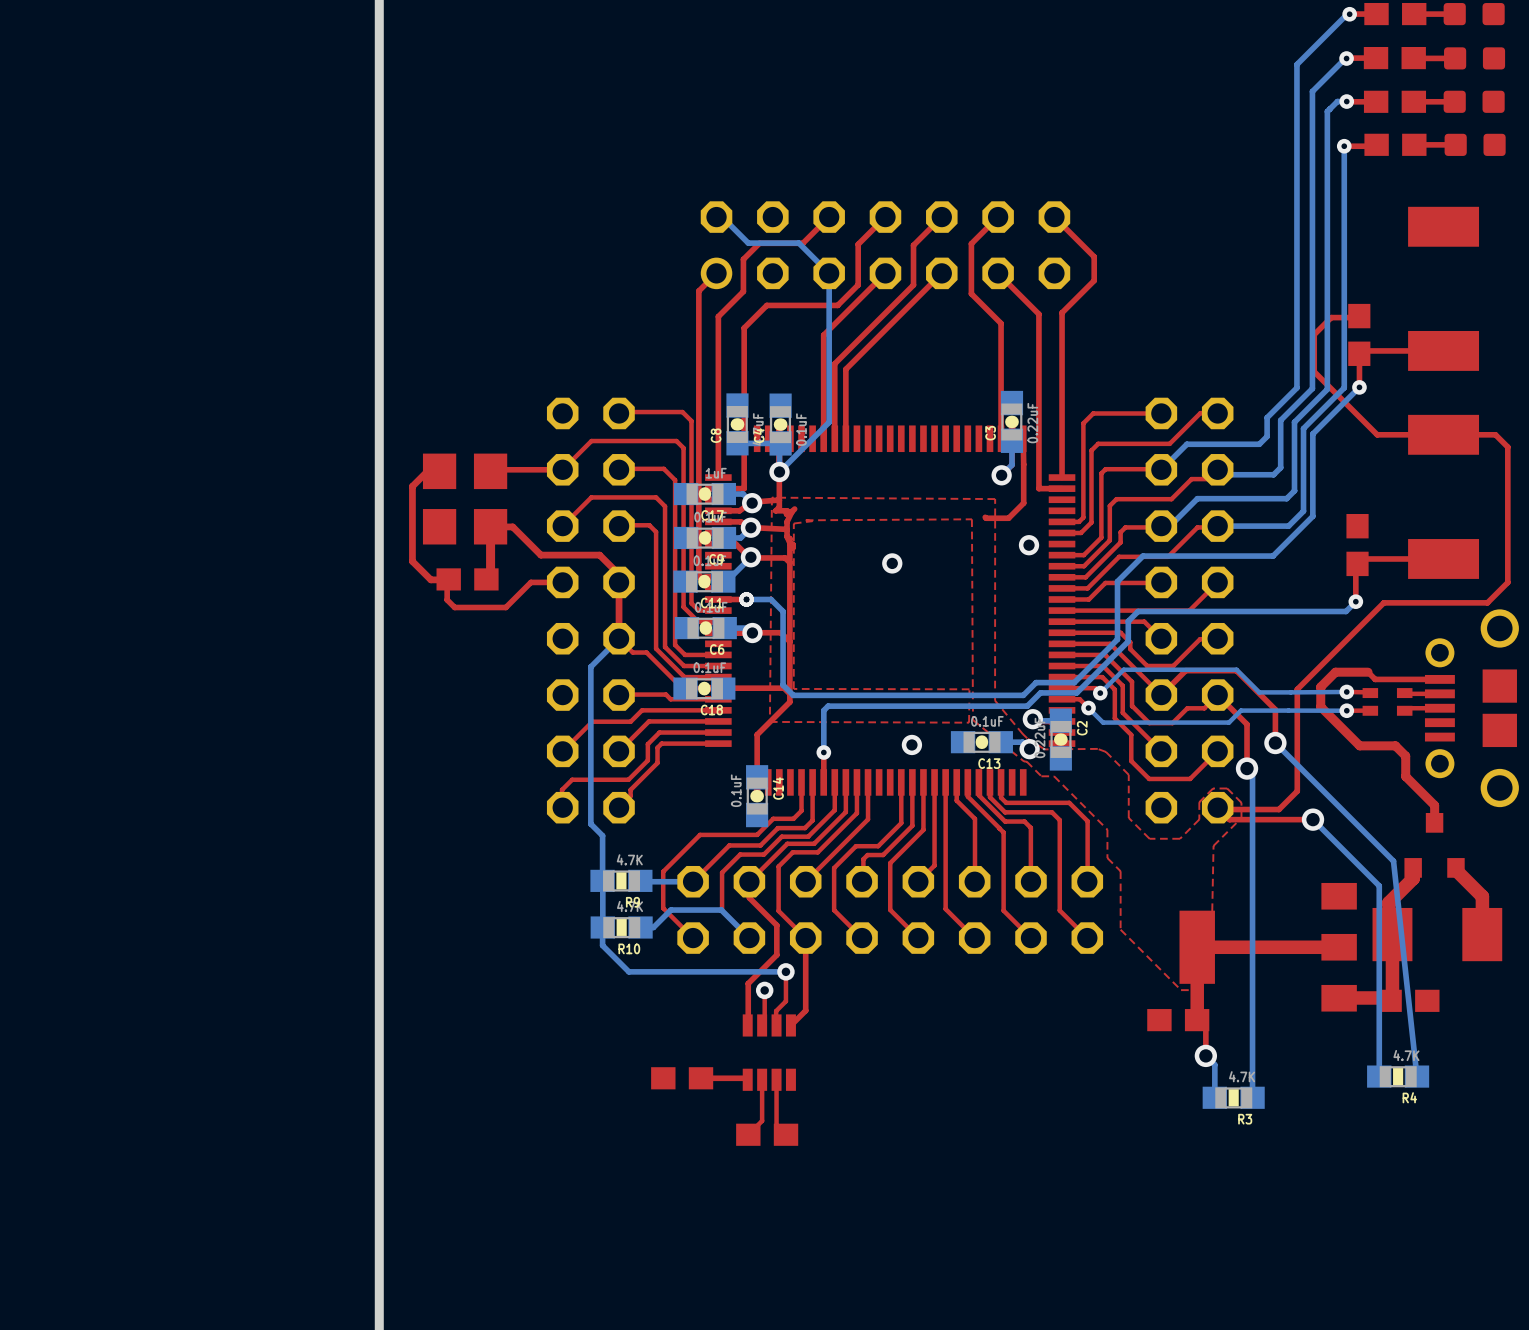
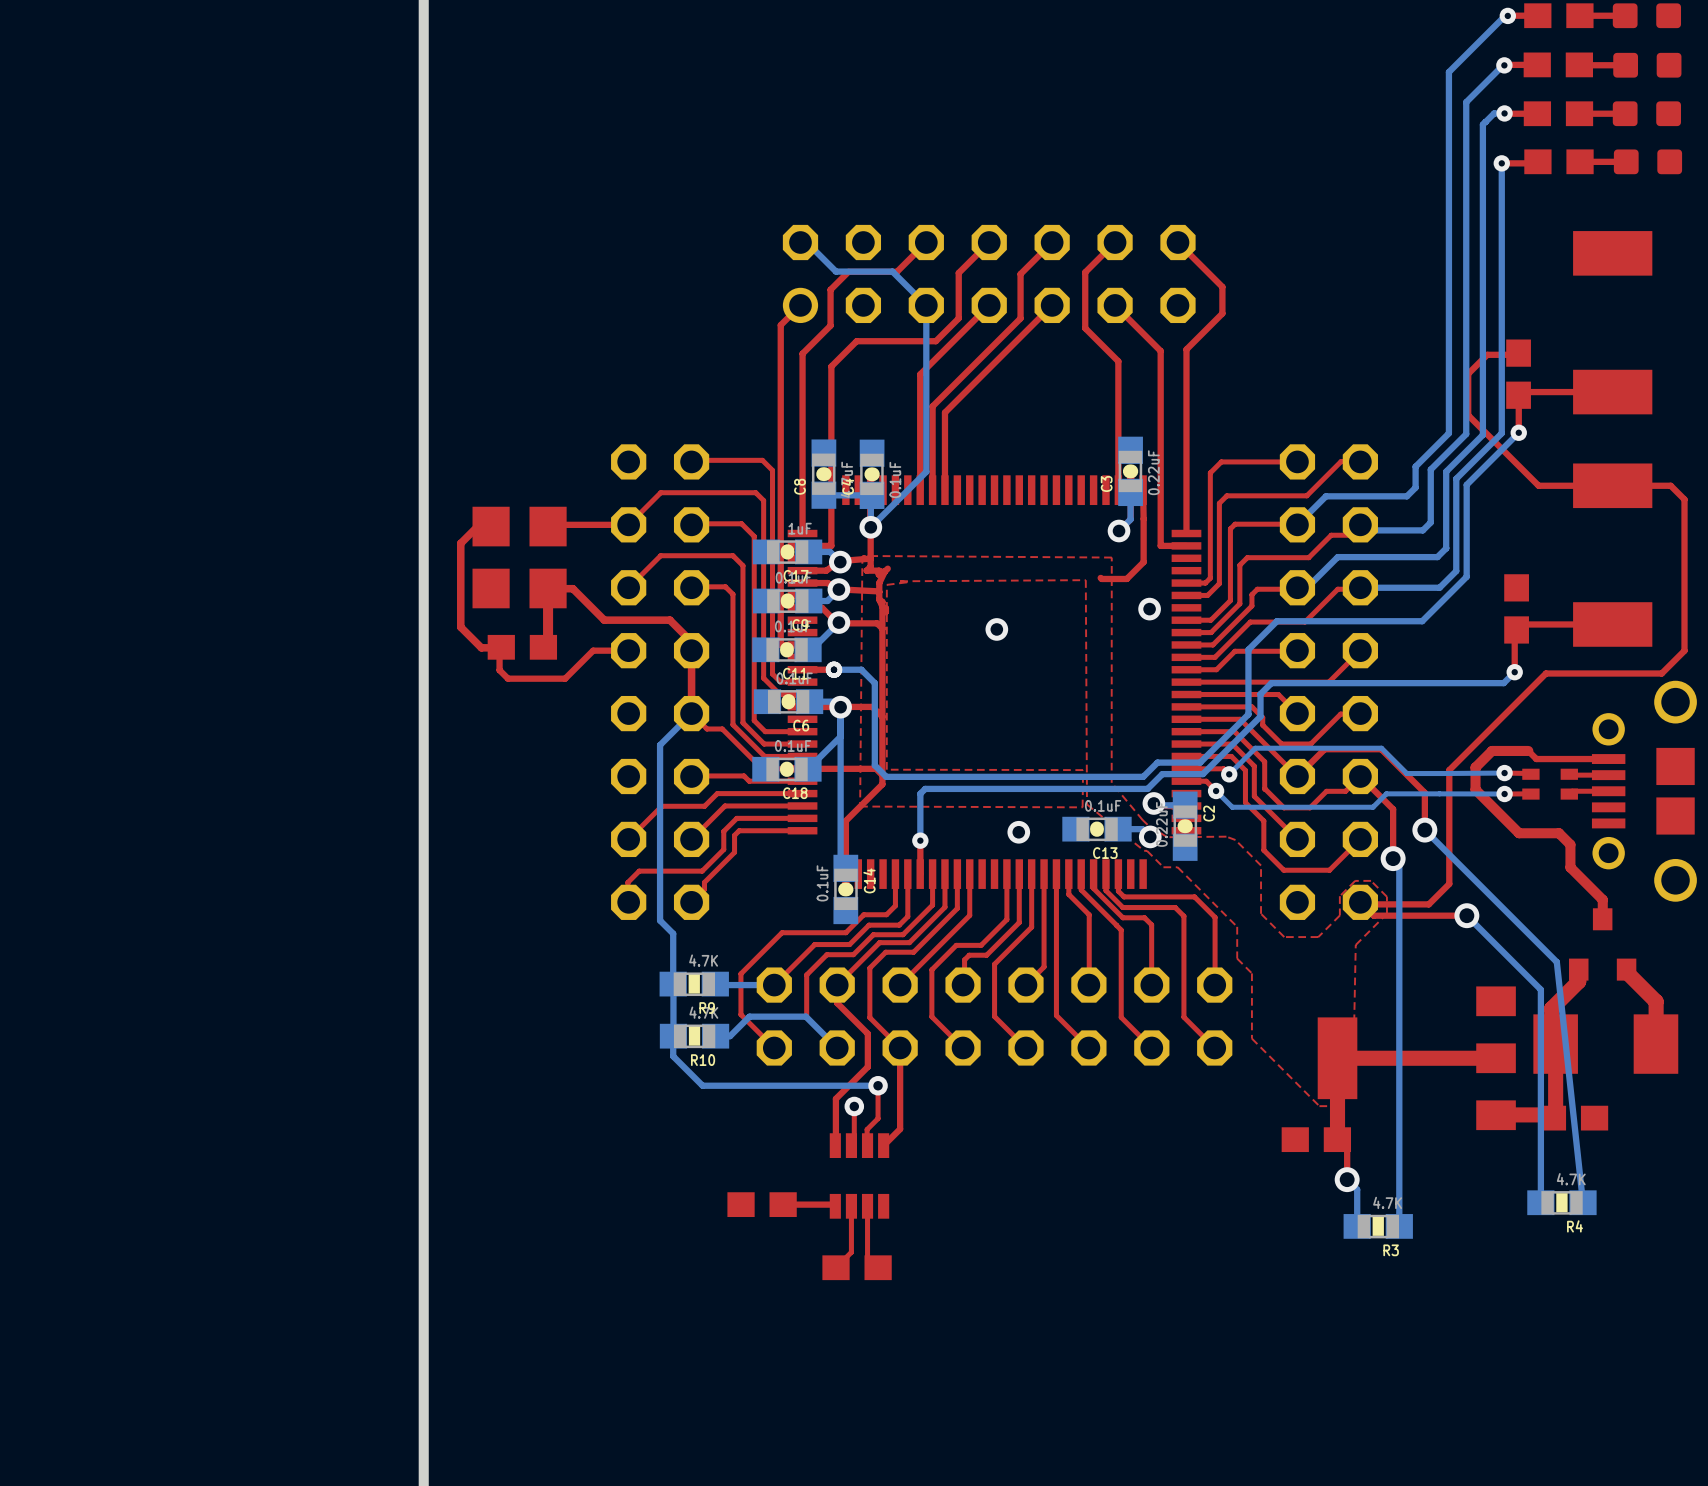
bottom track: none -> (840, 707) (840, 863) (845, 868)
bottom track: none -> (840, 736) (807, 769)

